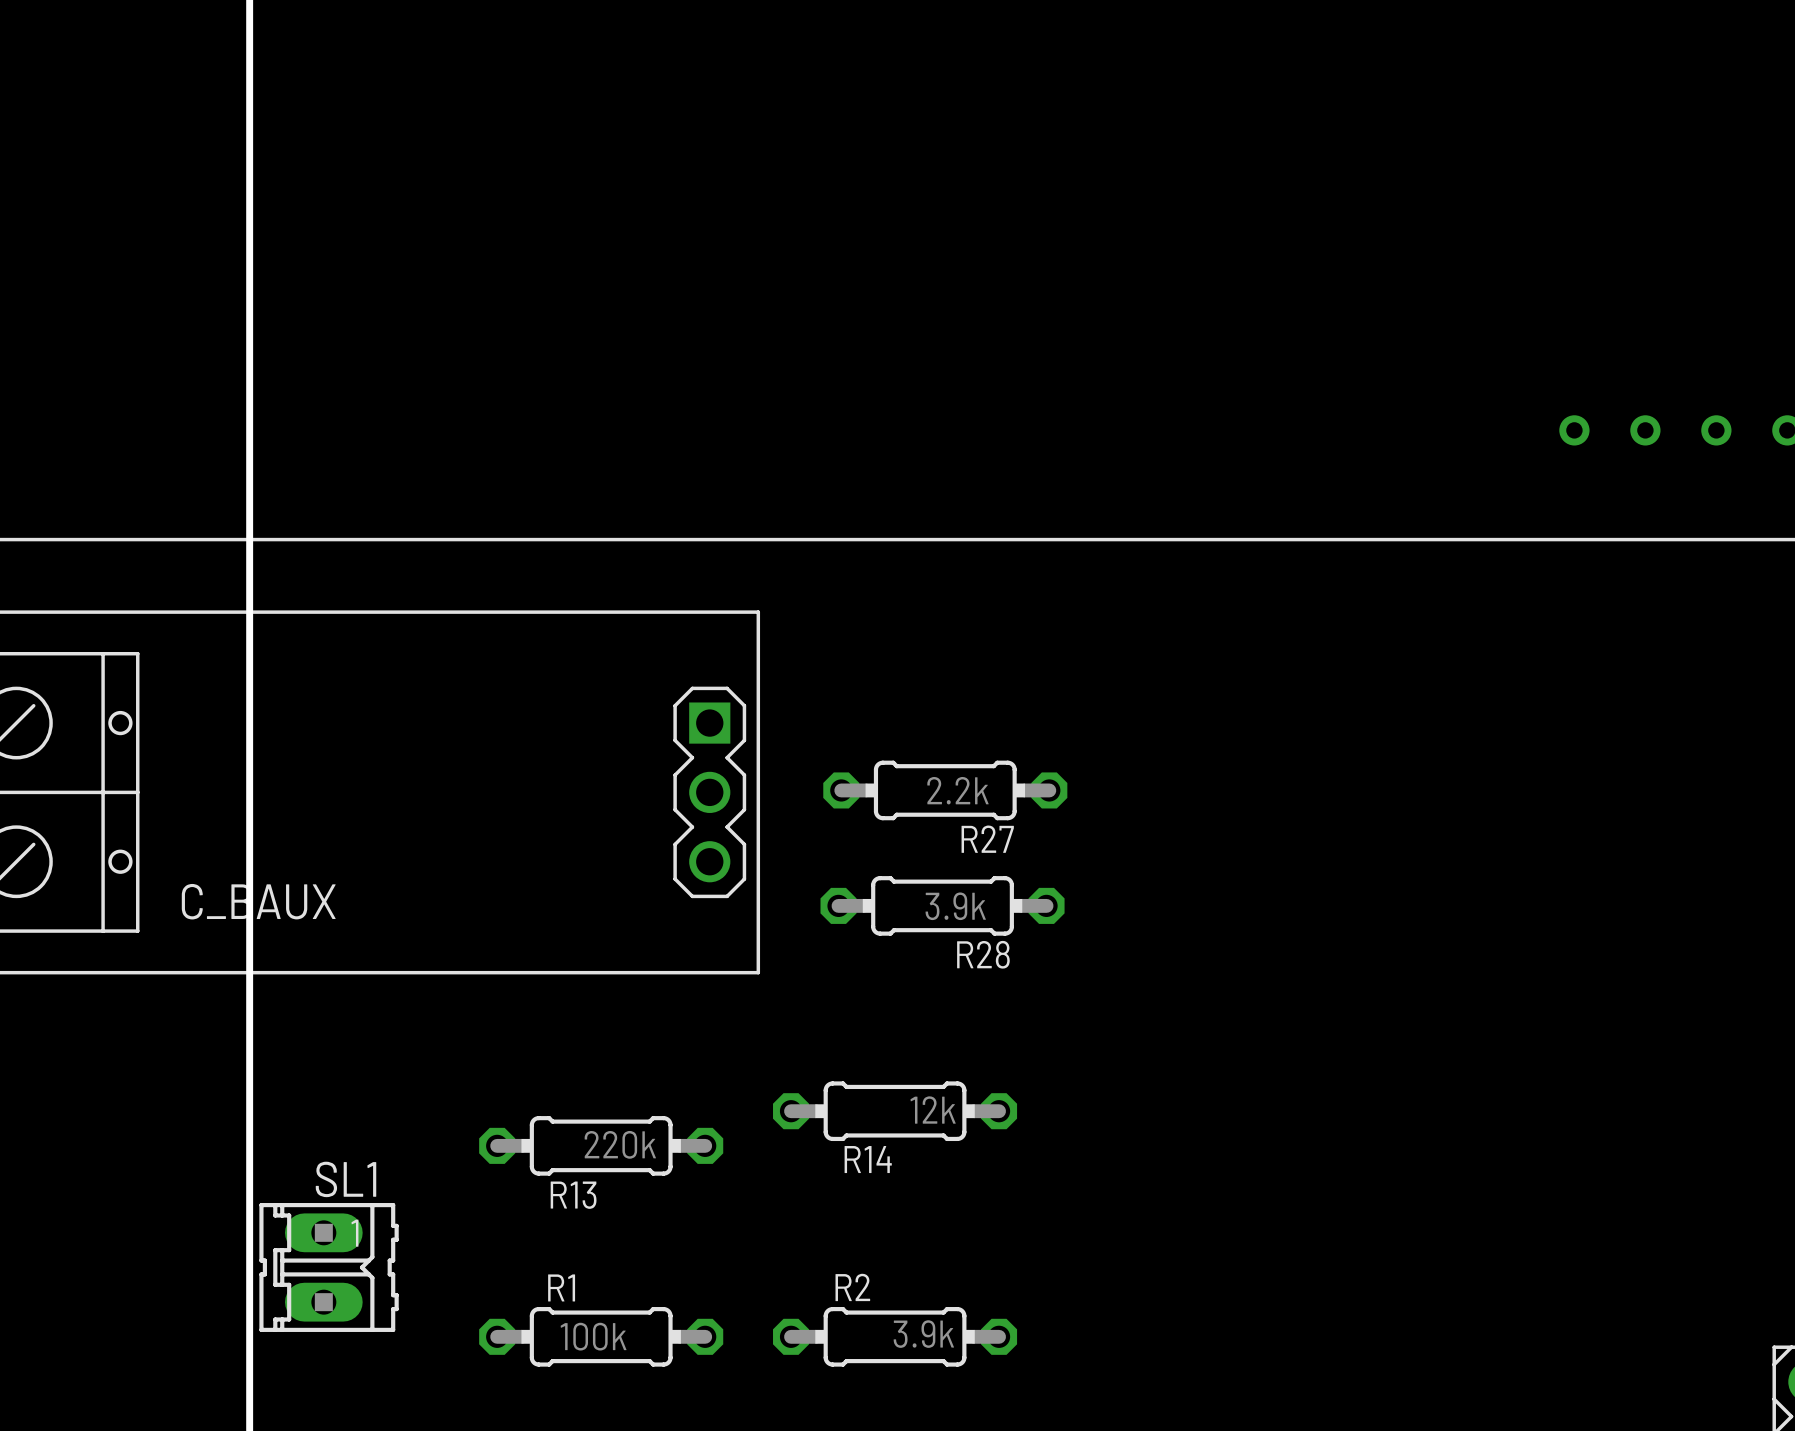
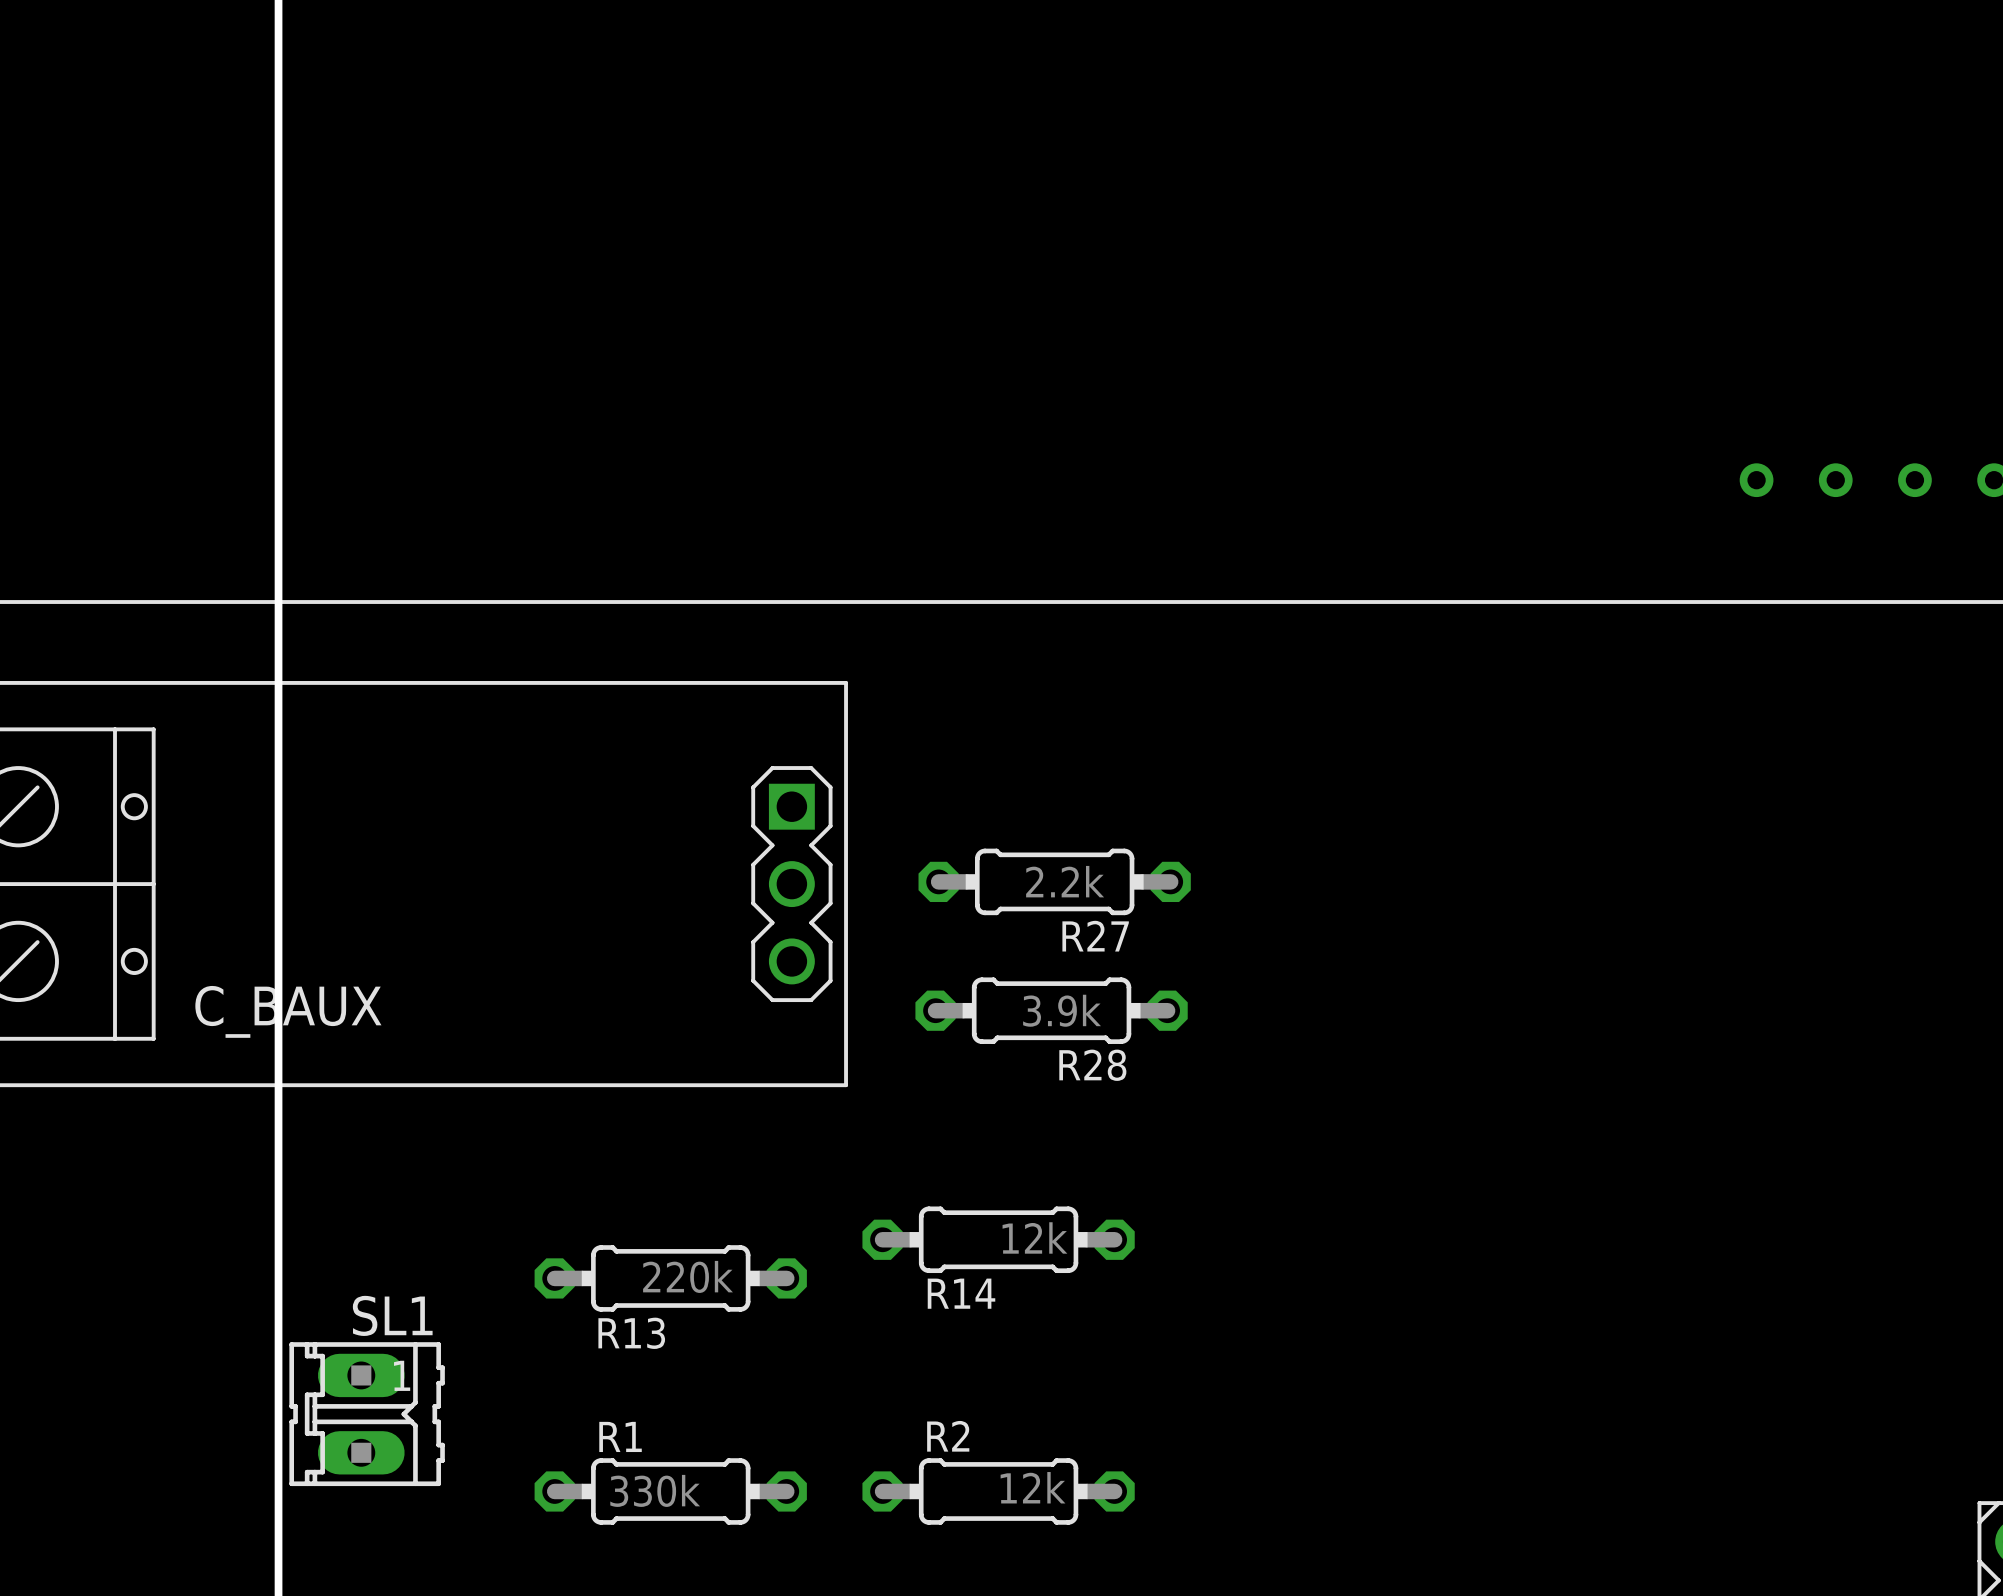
R2 value: 3.9k (923, 1334) -> 12k (1033, 1487)
R1 value: 100k (593, 1336) -> 330k (655, 1490)

